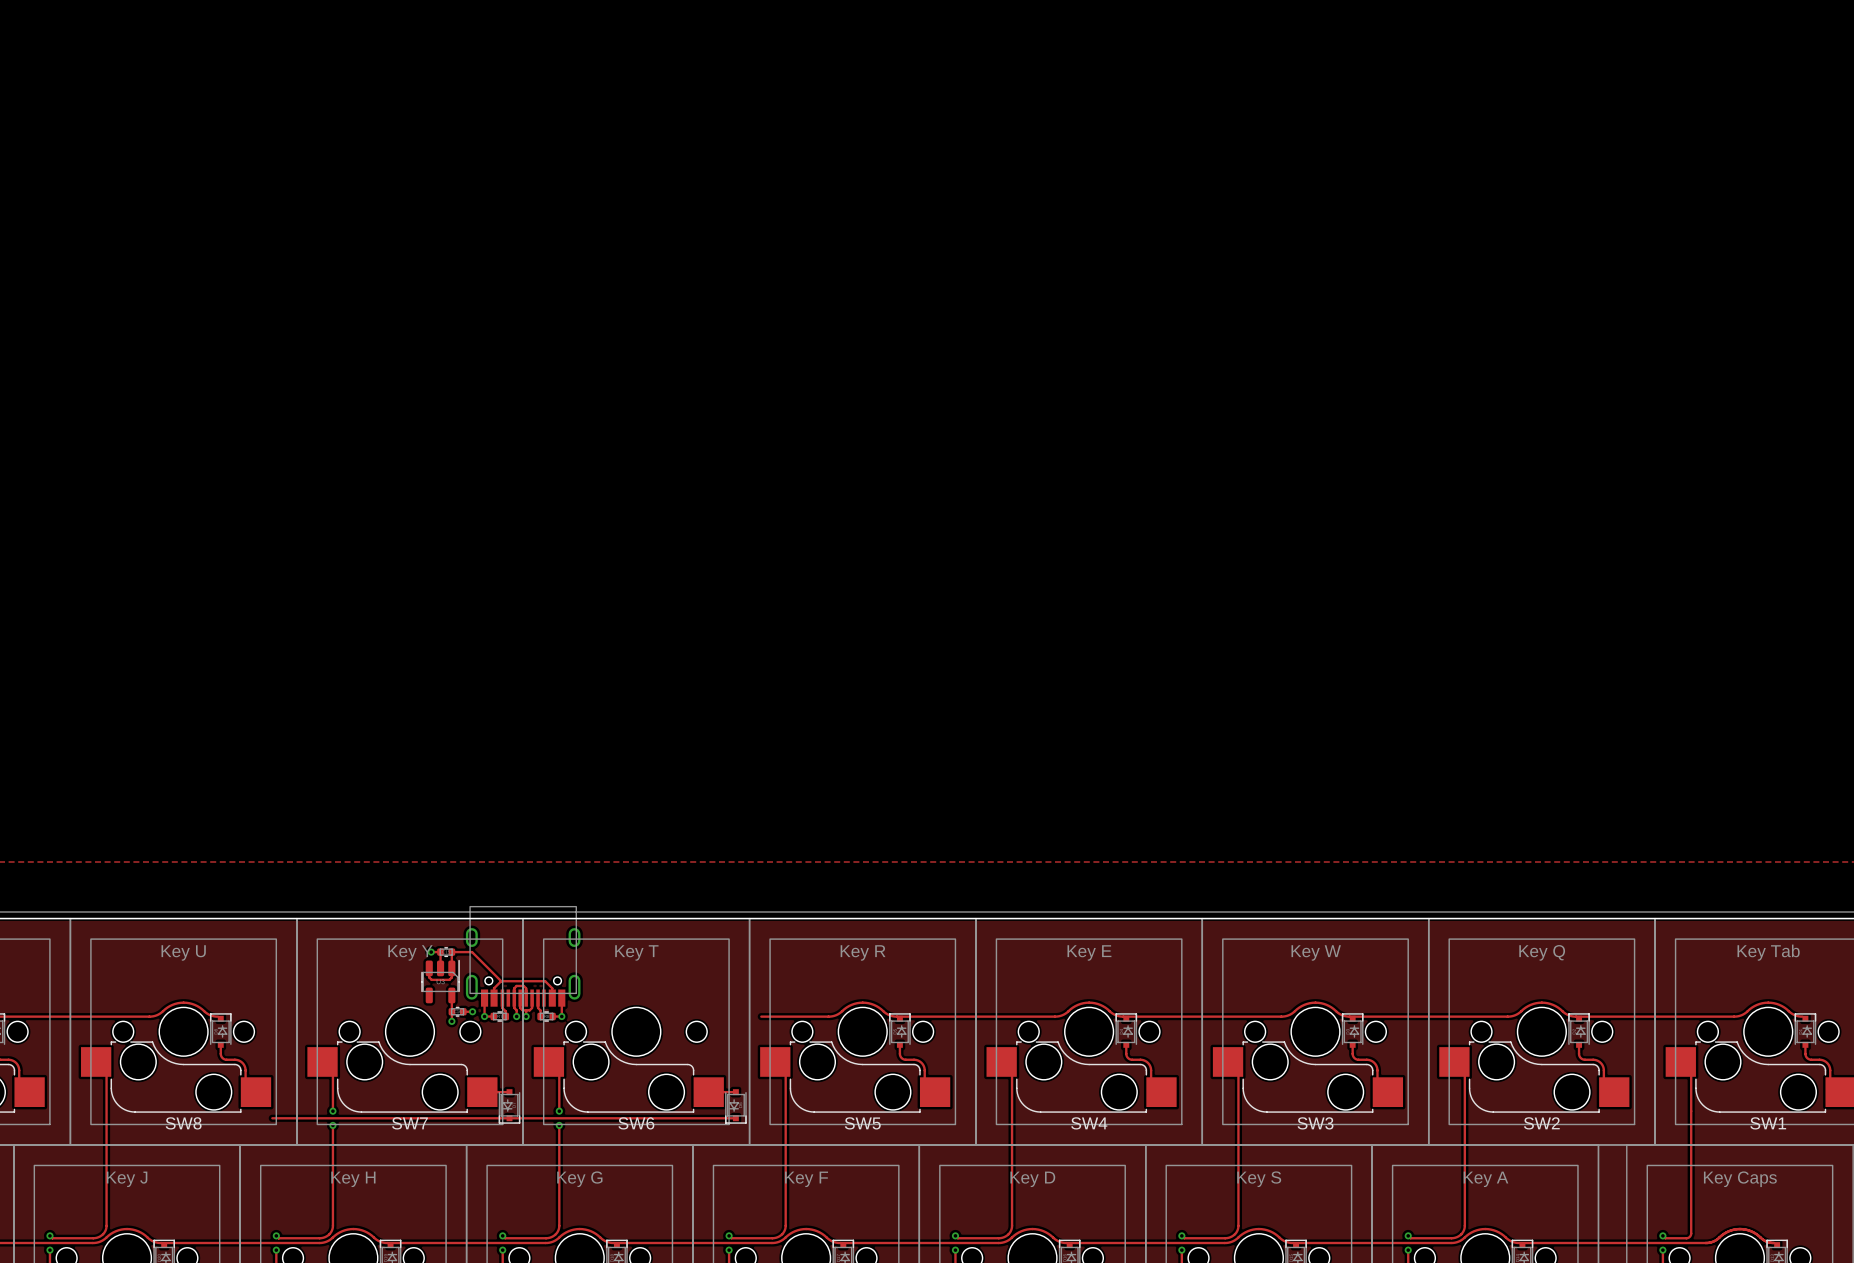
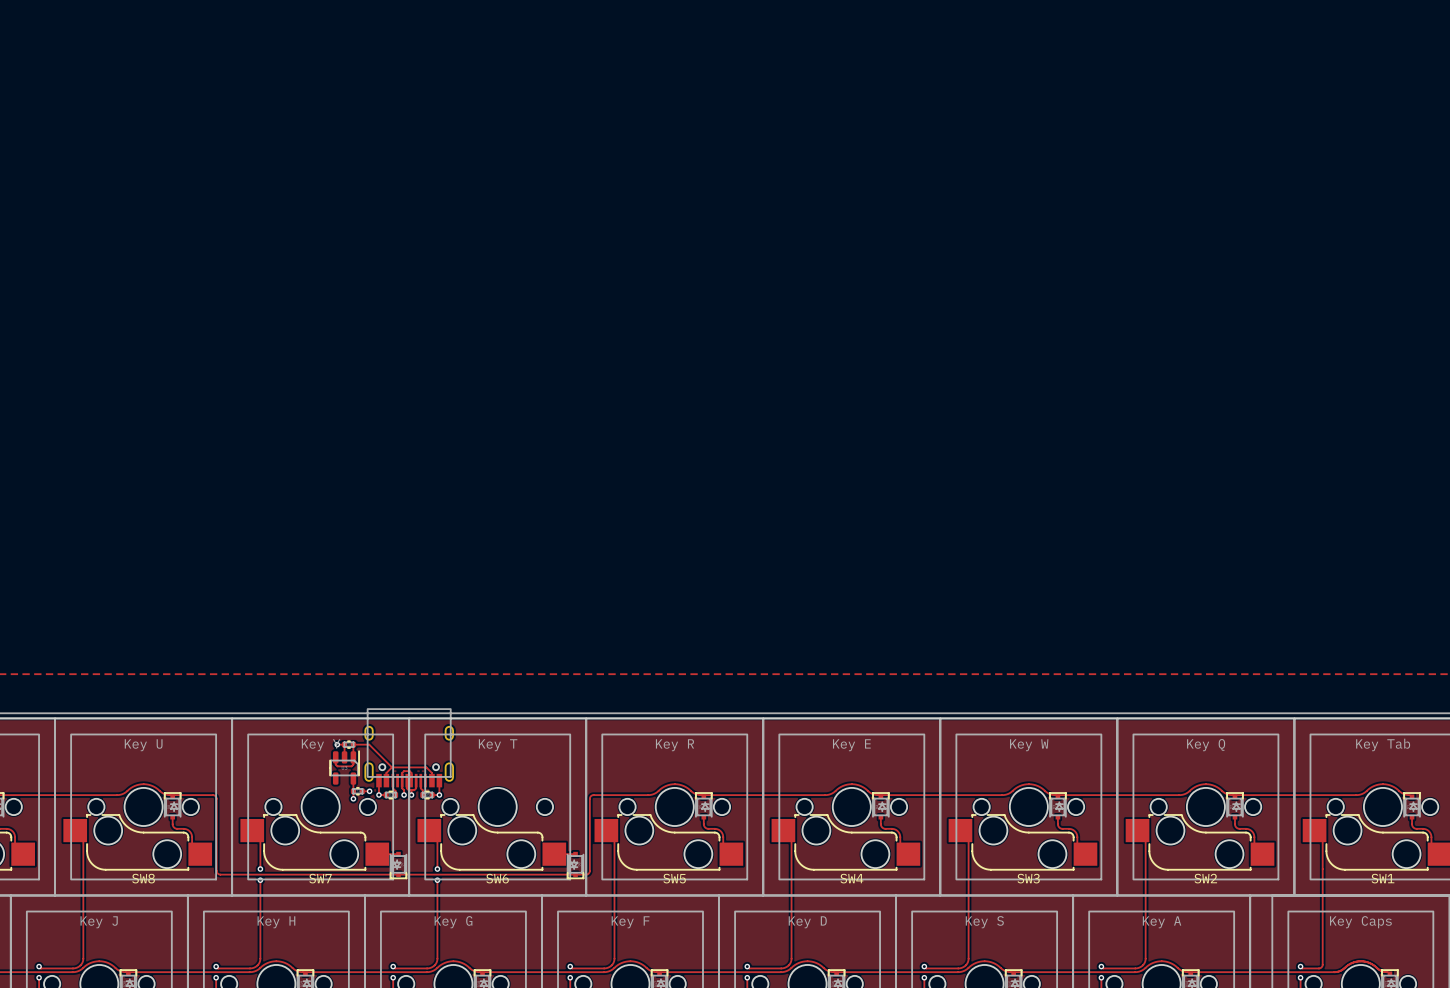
track: none -> (595, 795) (589, 798) (589, 871) (586, 874) (575, 874)
track: (272, 1118) (281, 1118) -> (170, 795) (212, 795) (216, 796) (216, 870) (220, 874)

